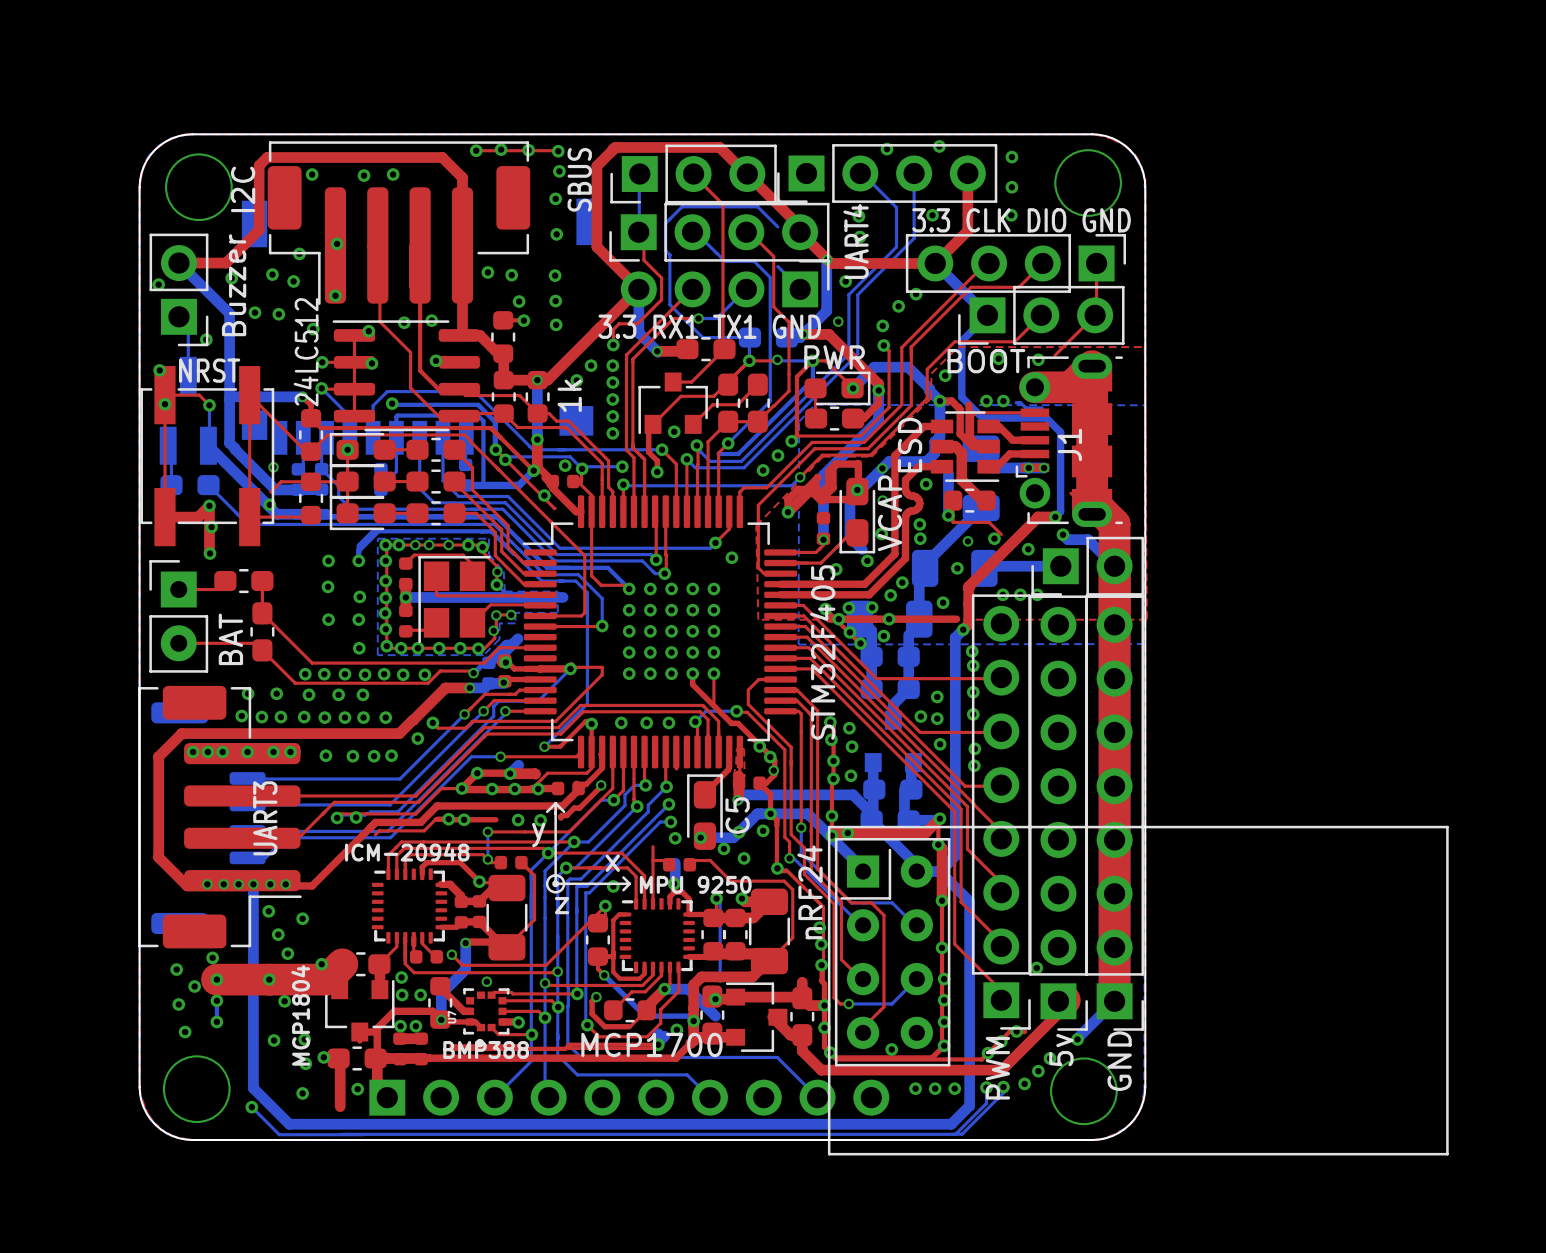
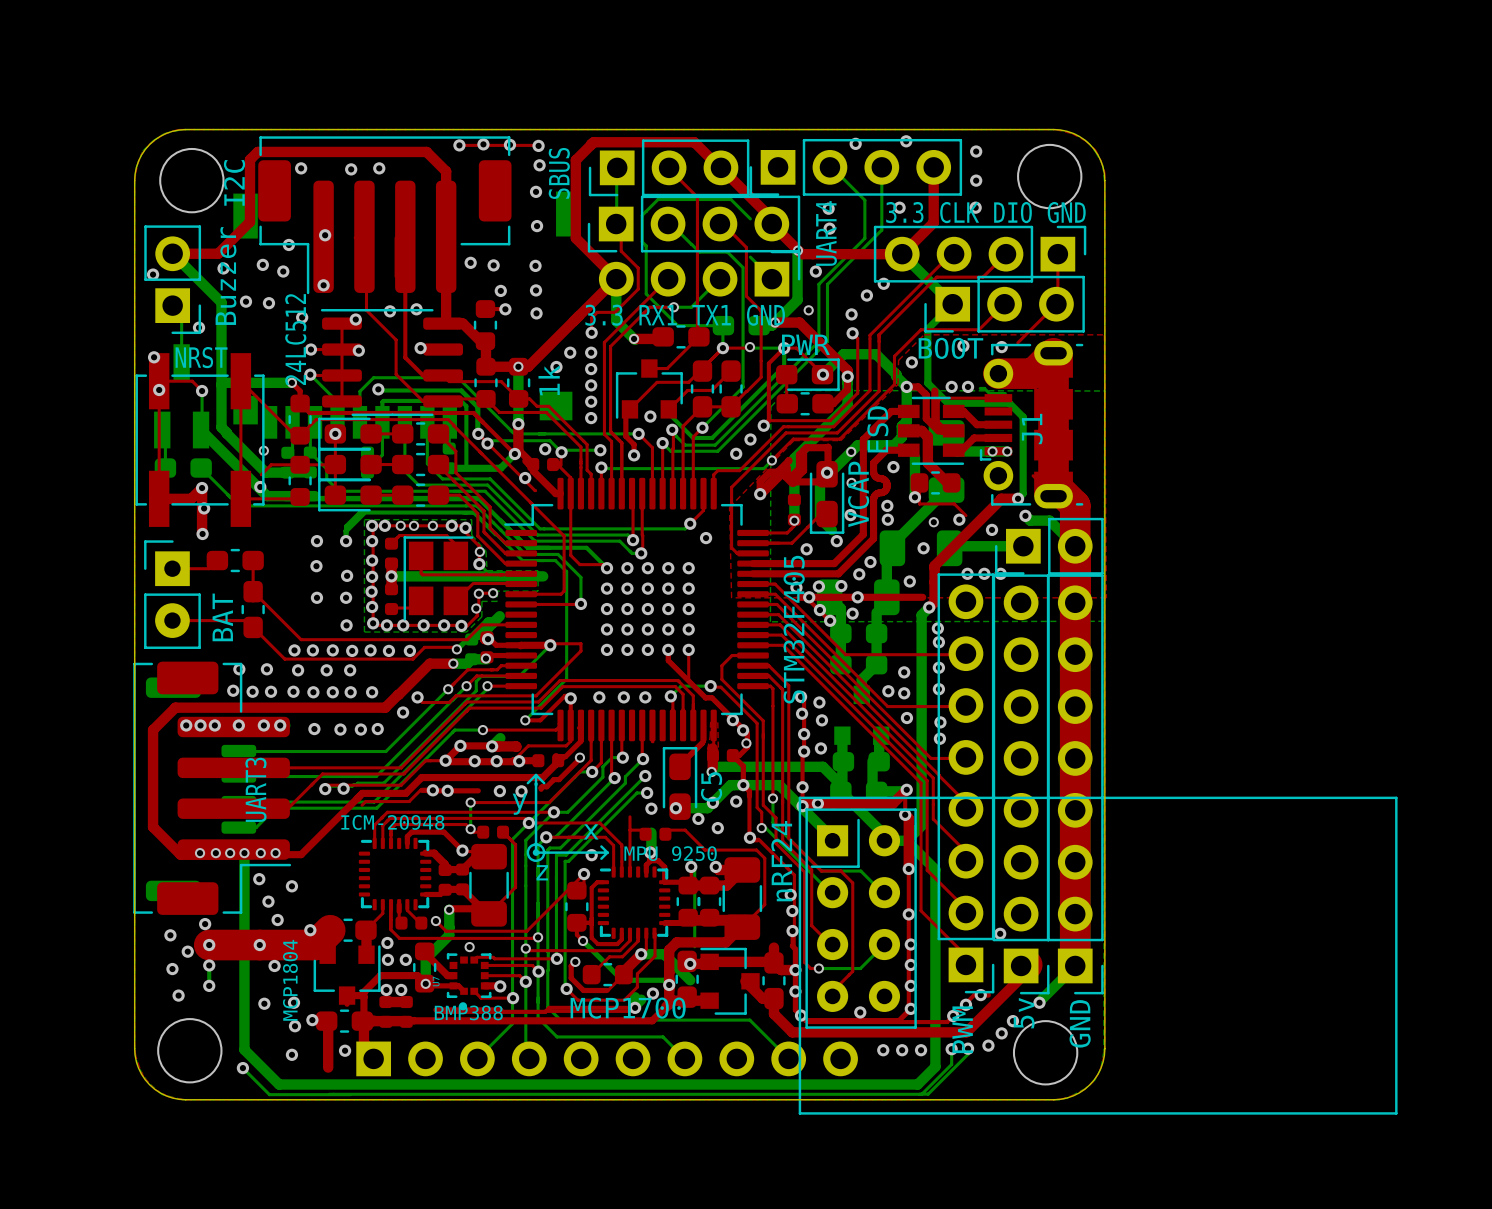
bottom track: none -> (664, 409) (693, 437)

